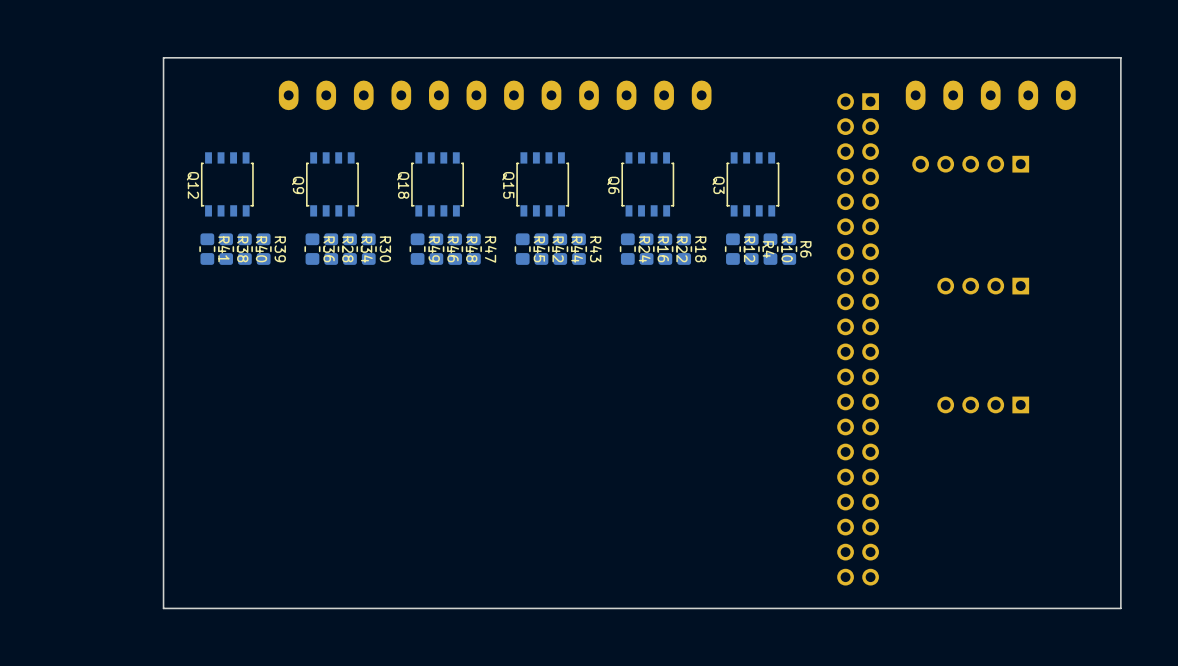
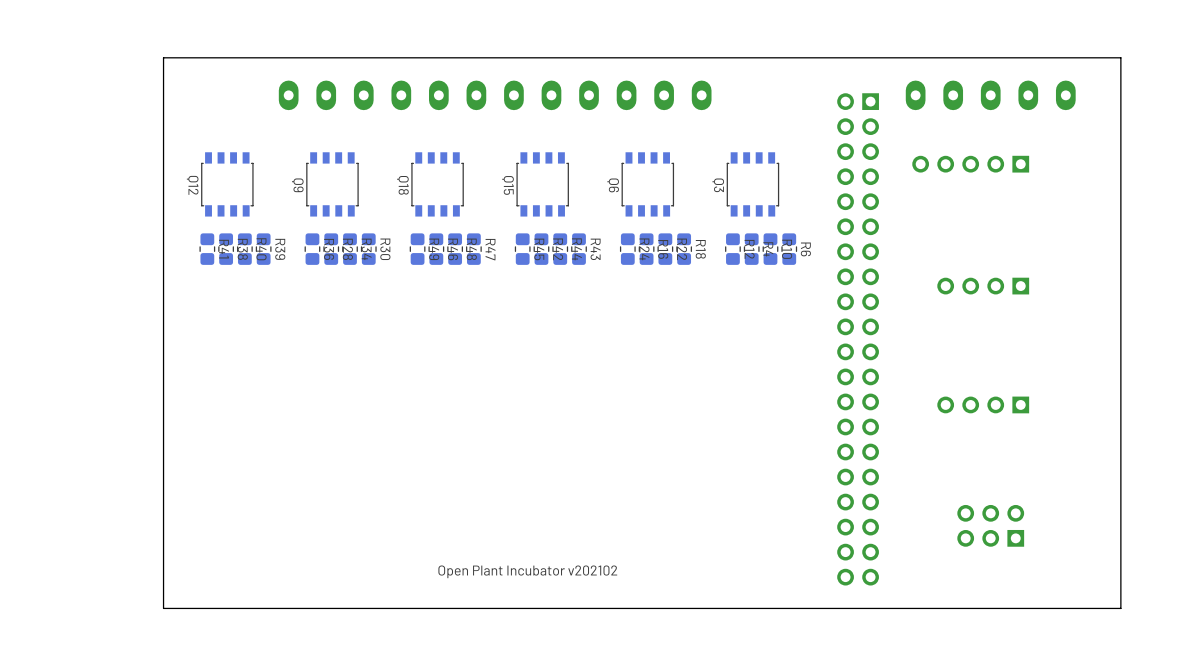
part: none -> (990, 525)
text: none -> Open Plant Incubator v202102 (527, 571)

